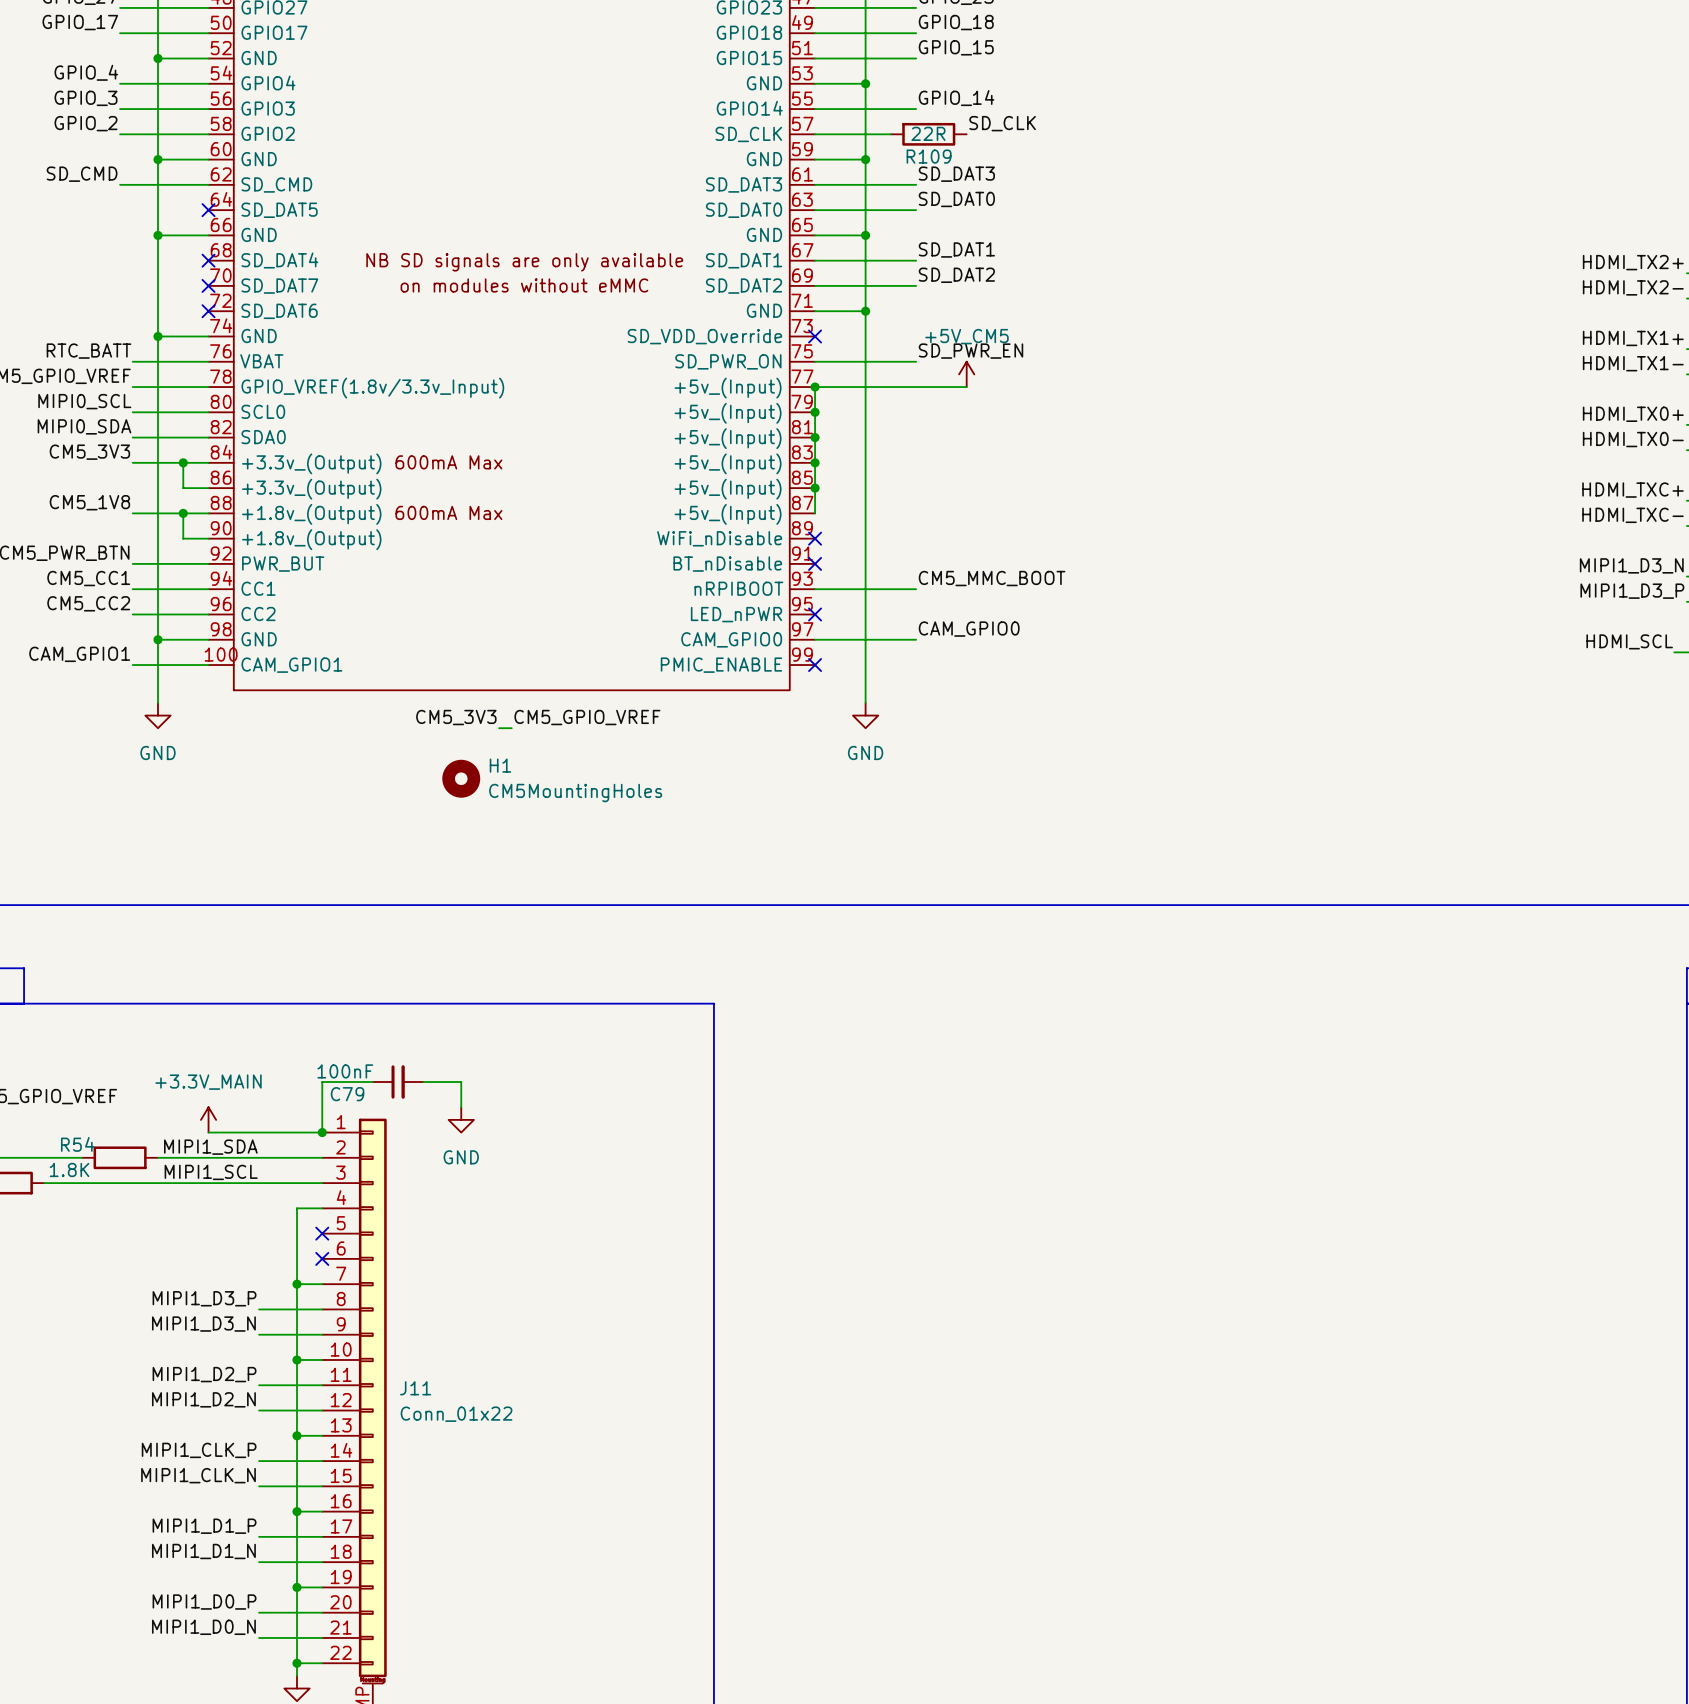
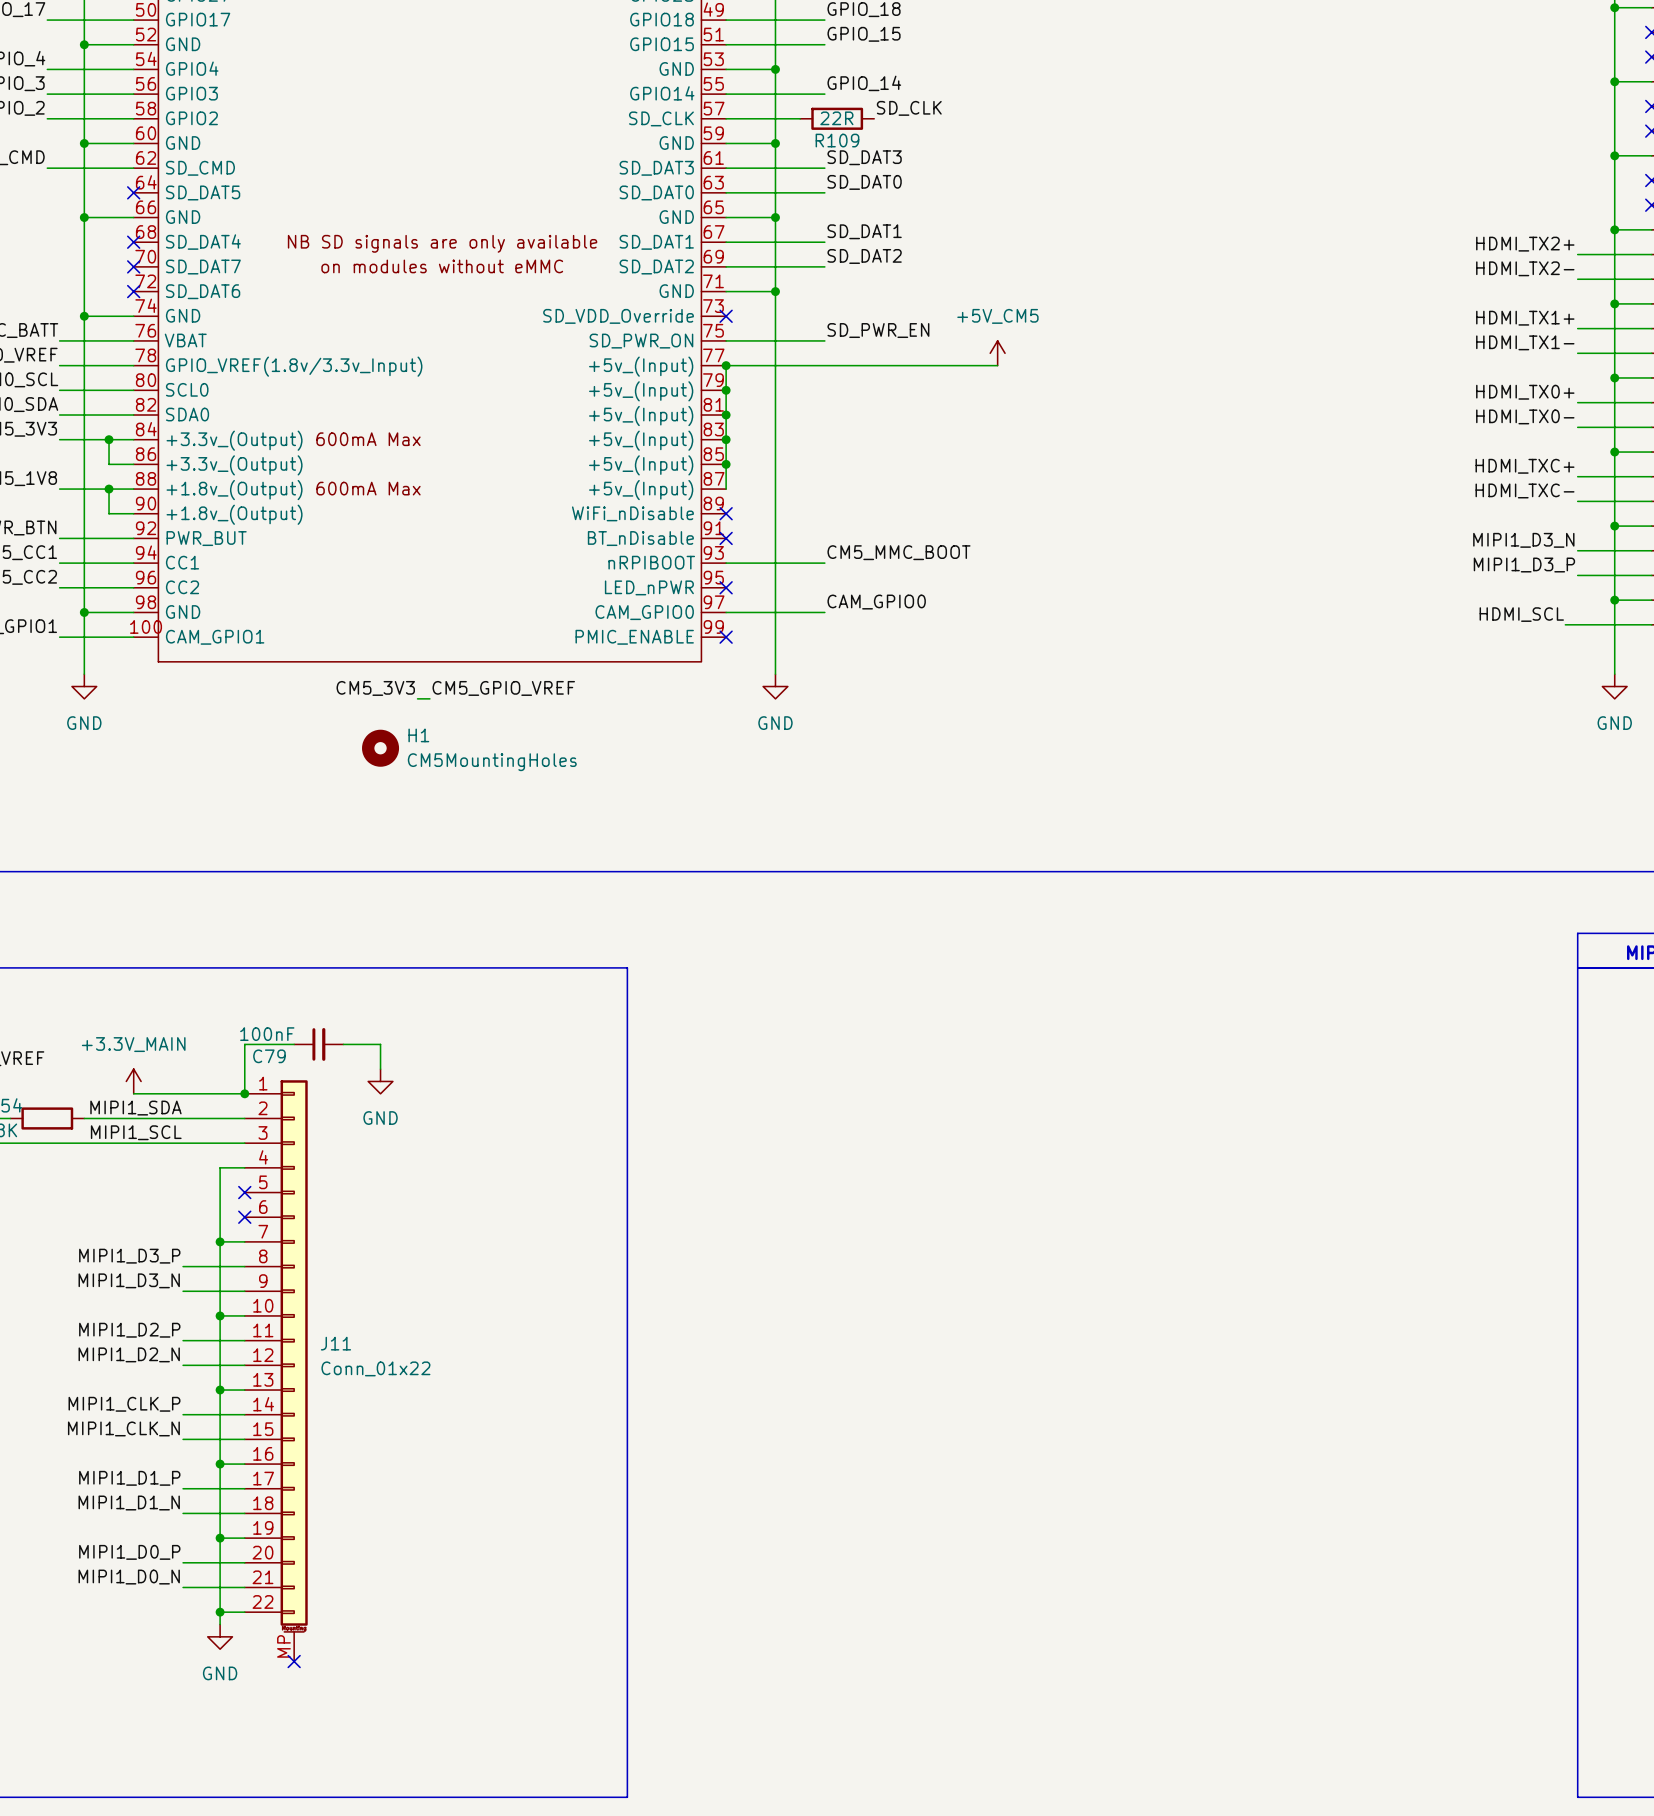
power symbol position: +5V_CM5 (966, 374) -> +5V_CM5 (997, 353)
wire: none -> (874, 365) (997, 365)

